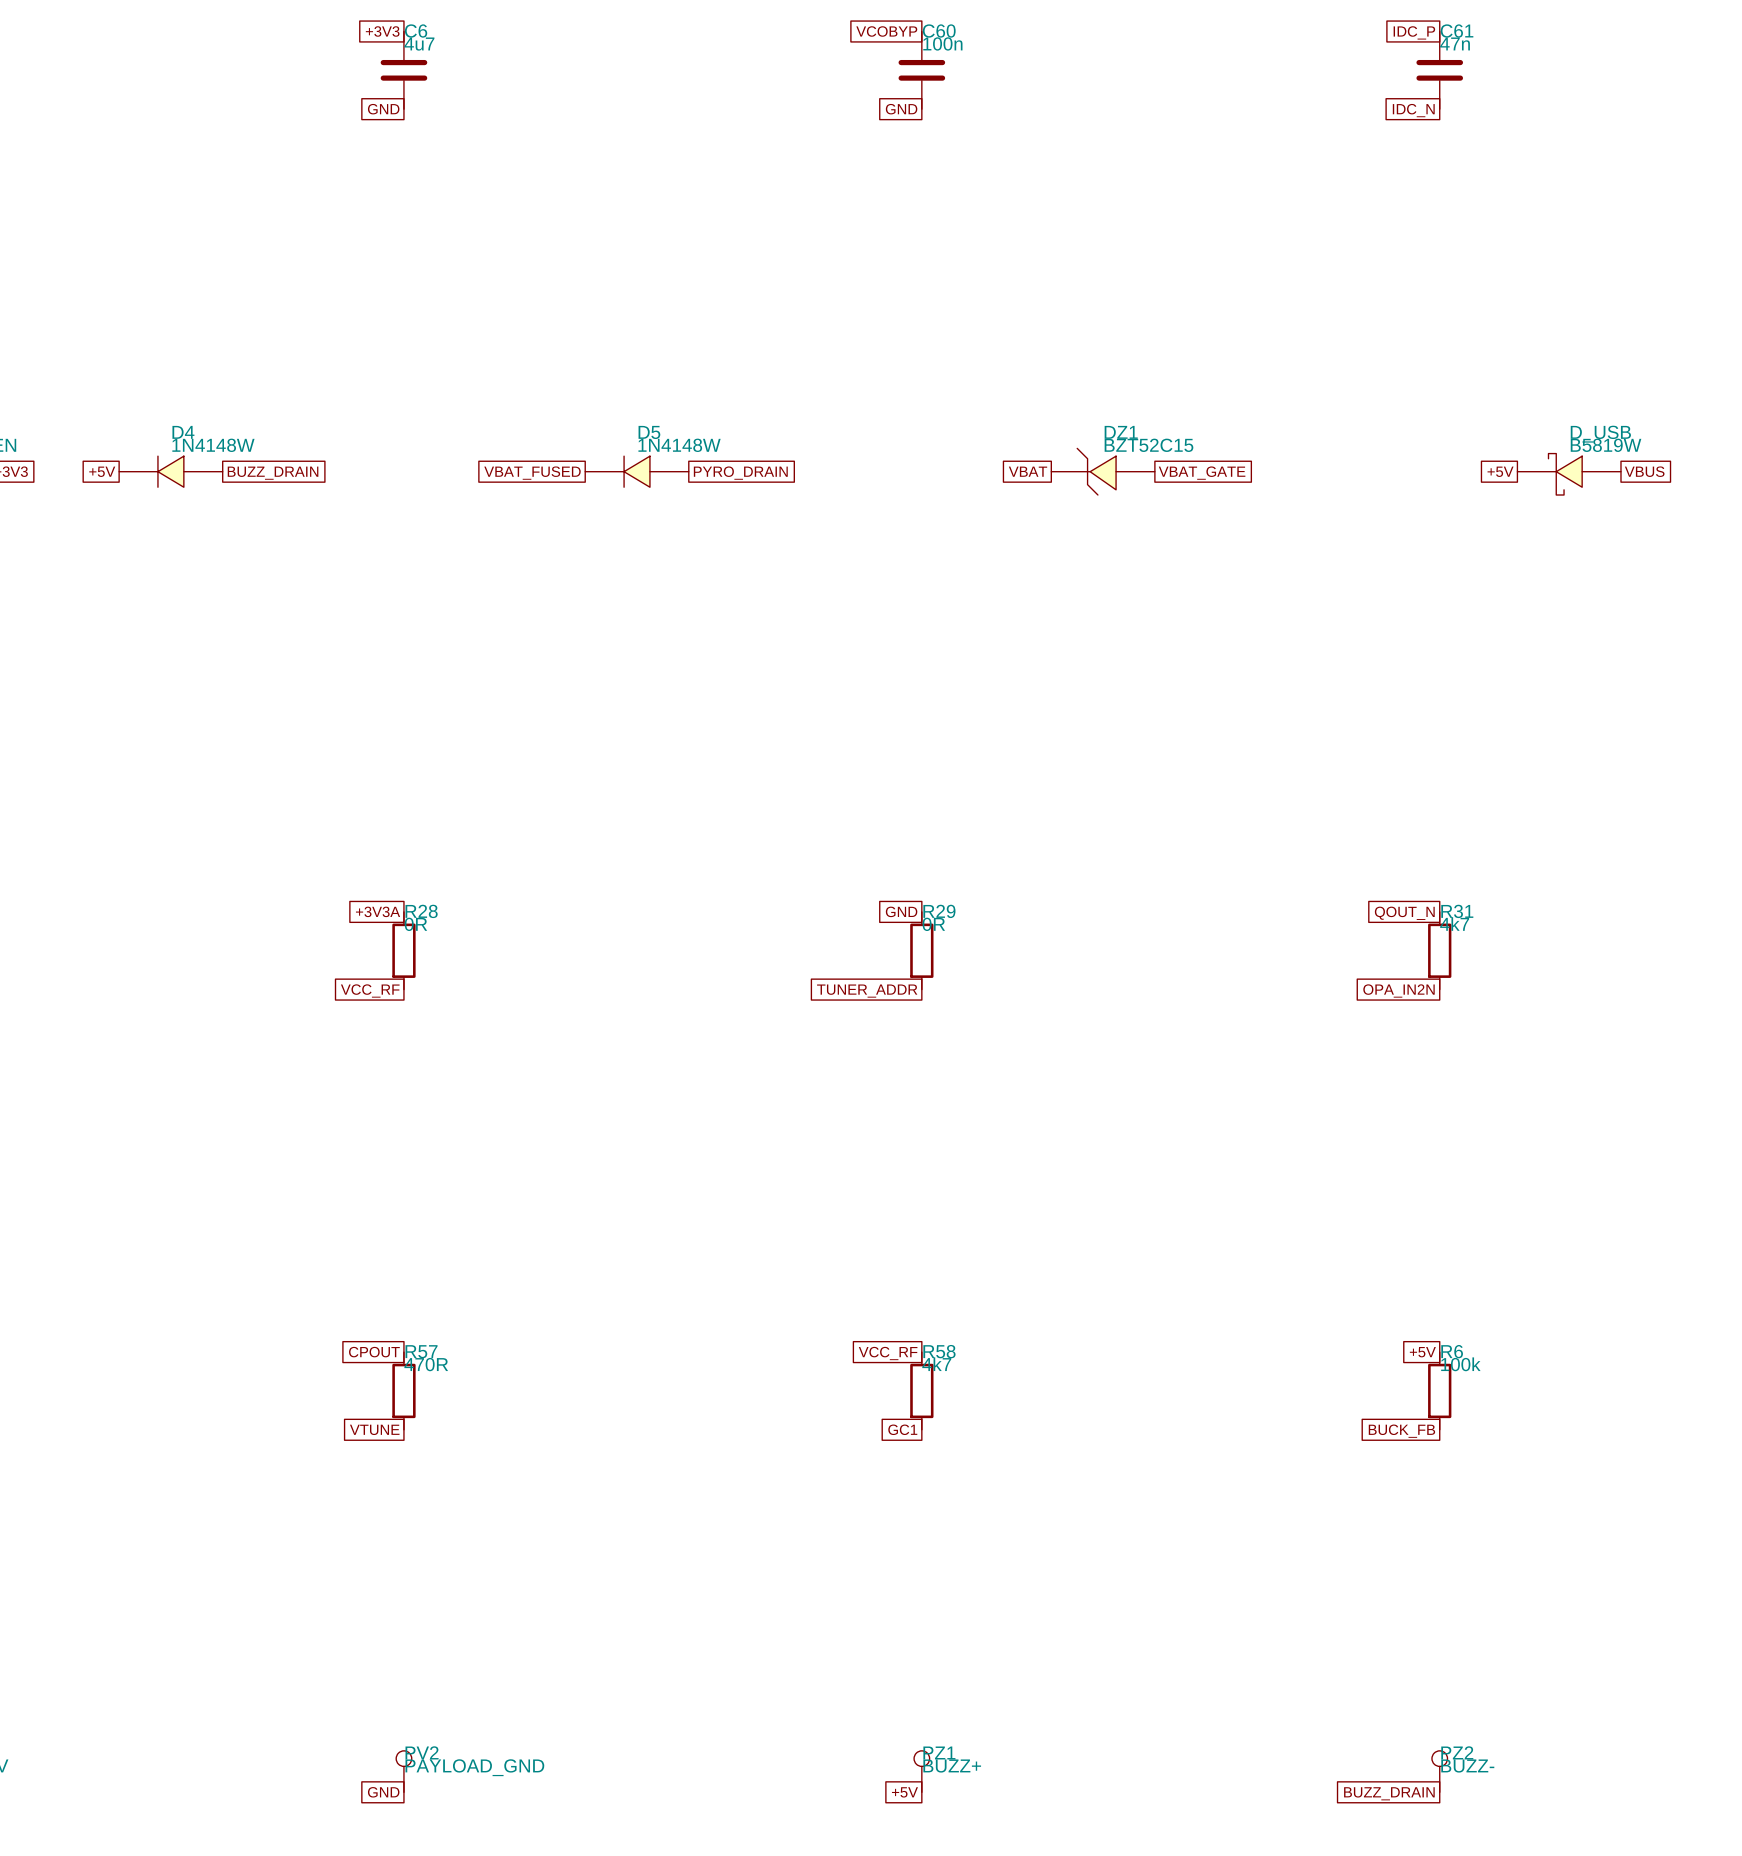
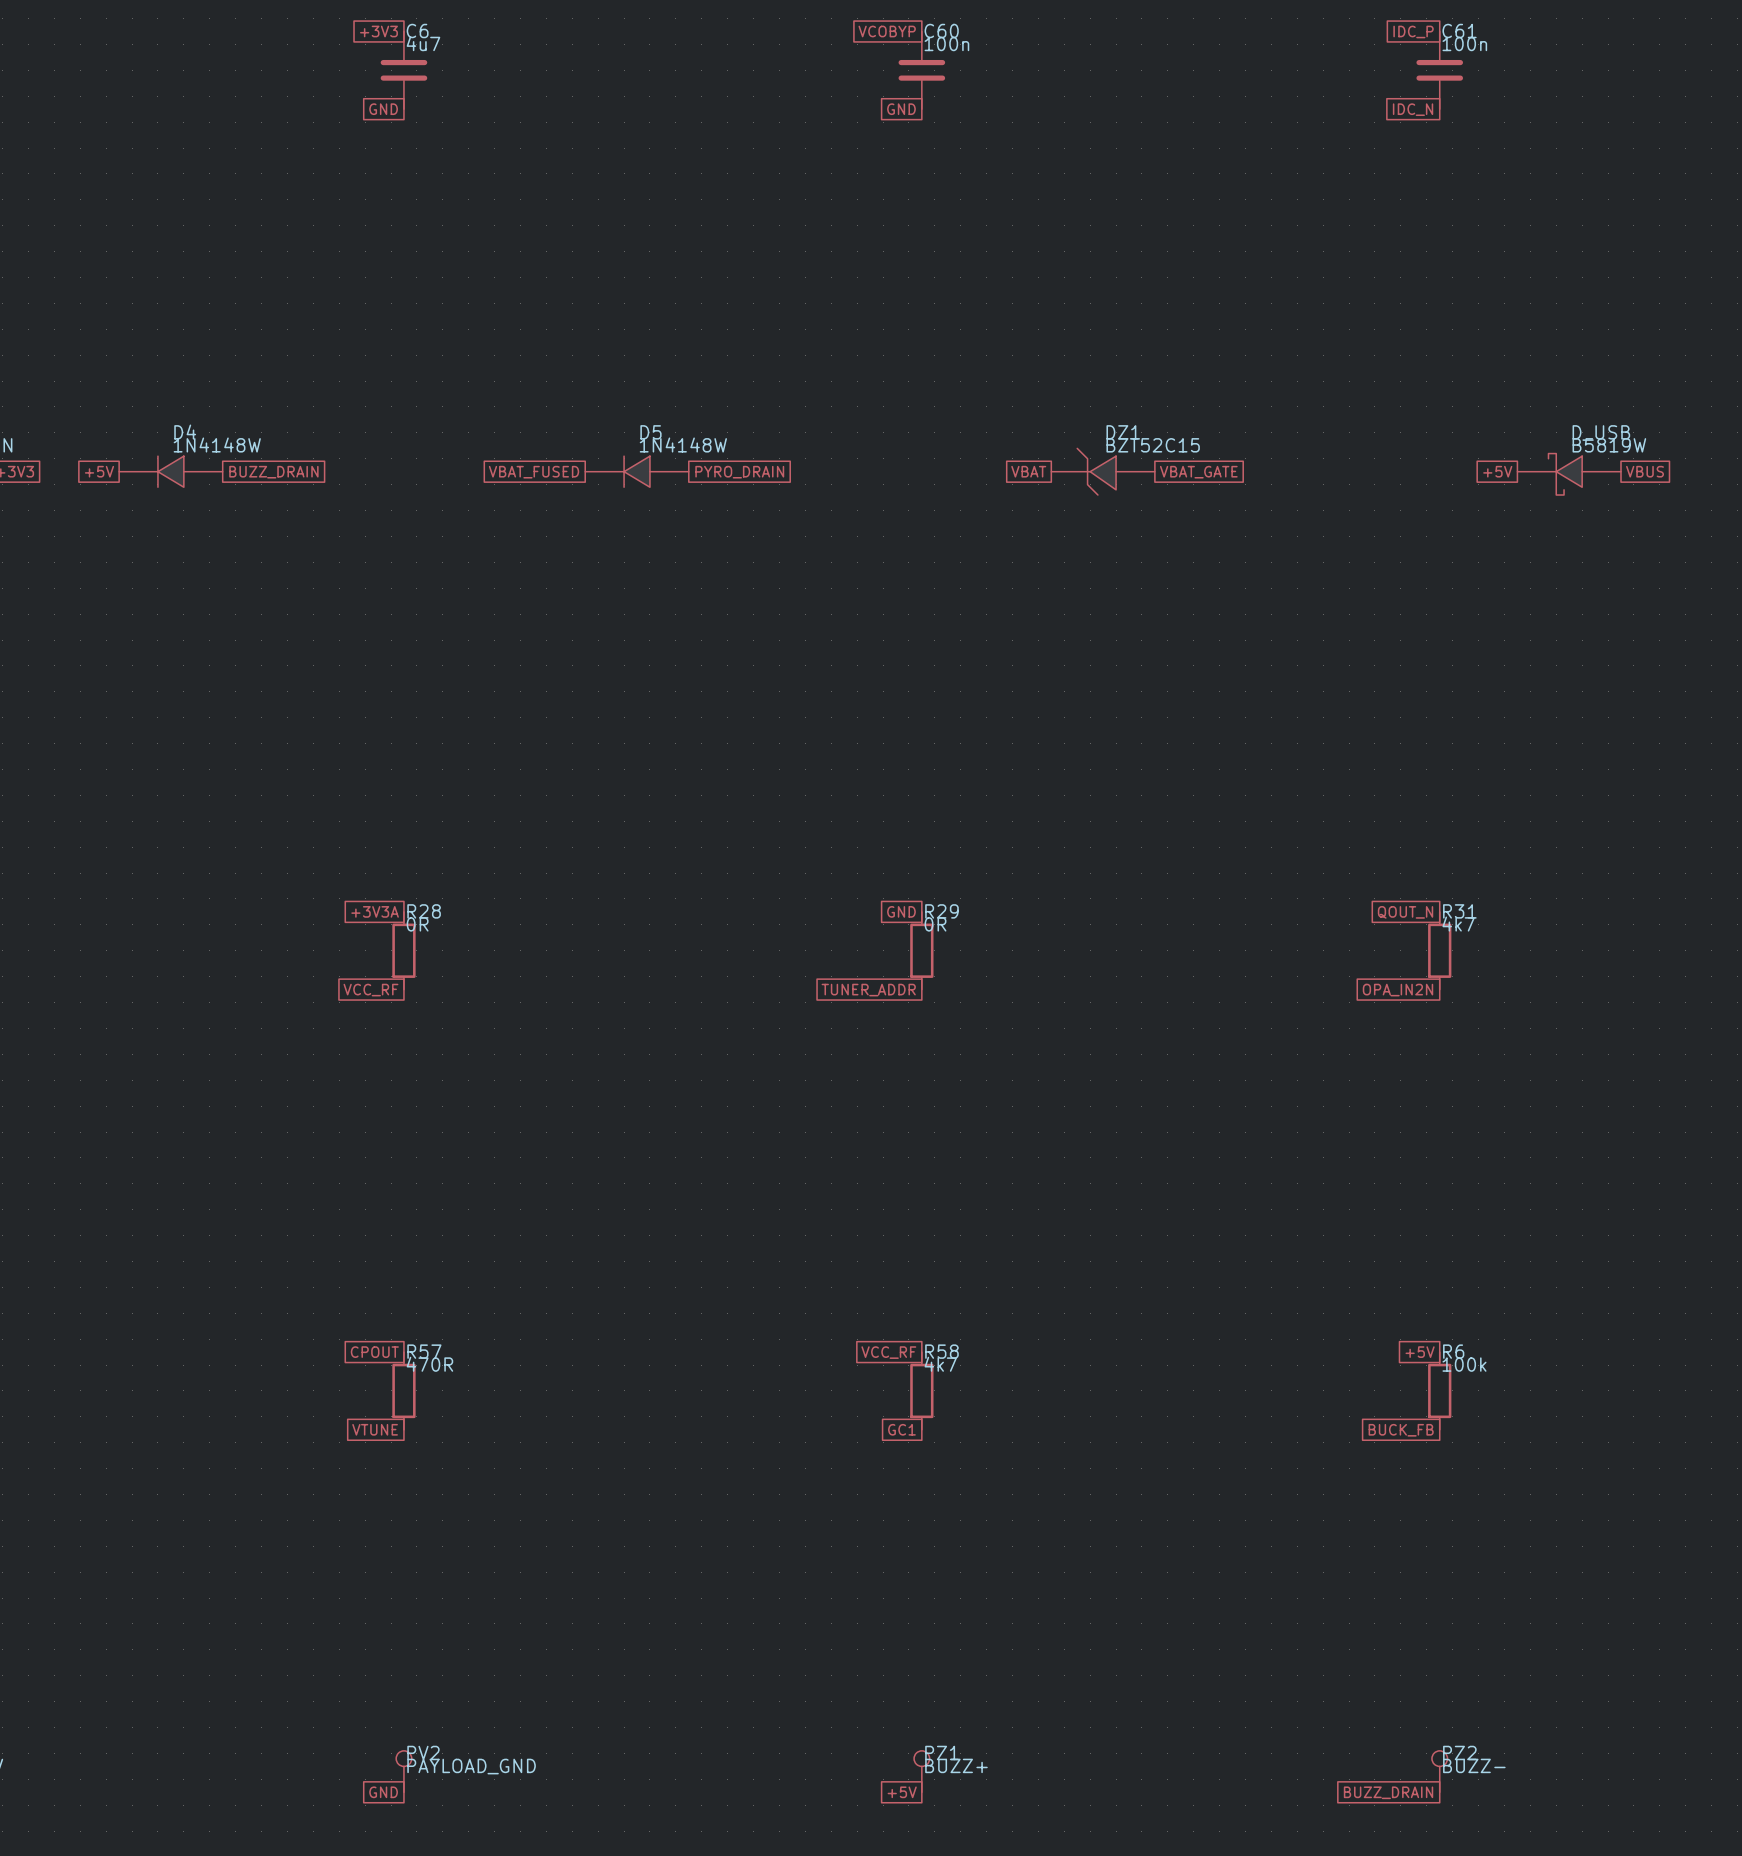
C61 value: 47n (1455, 43) -> 100n (1464, 43)

